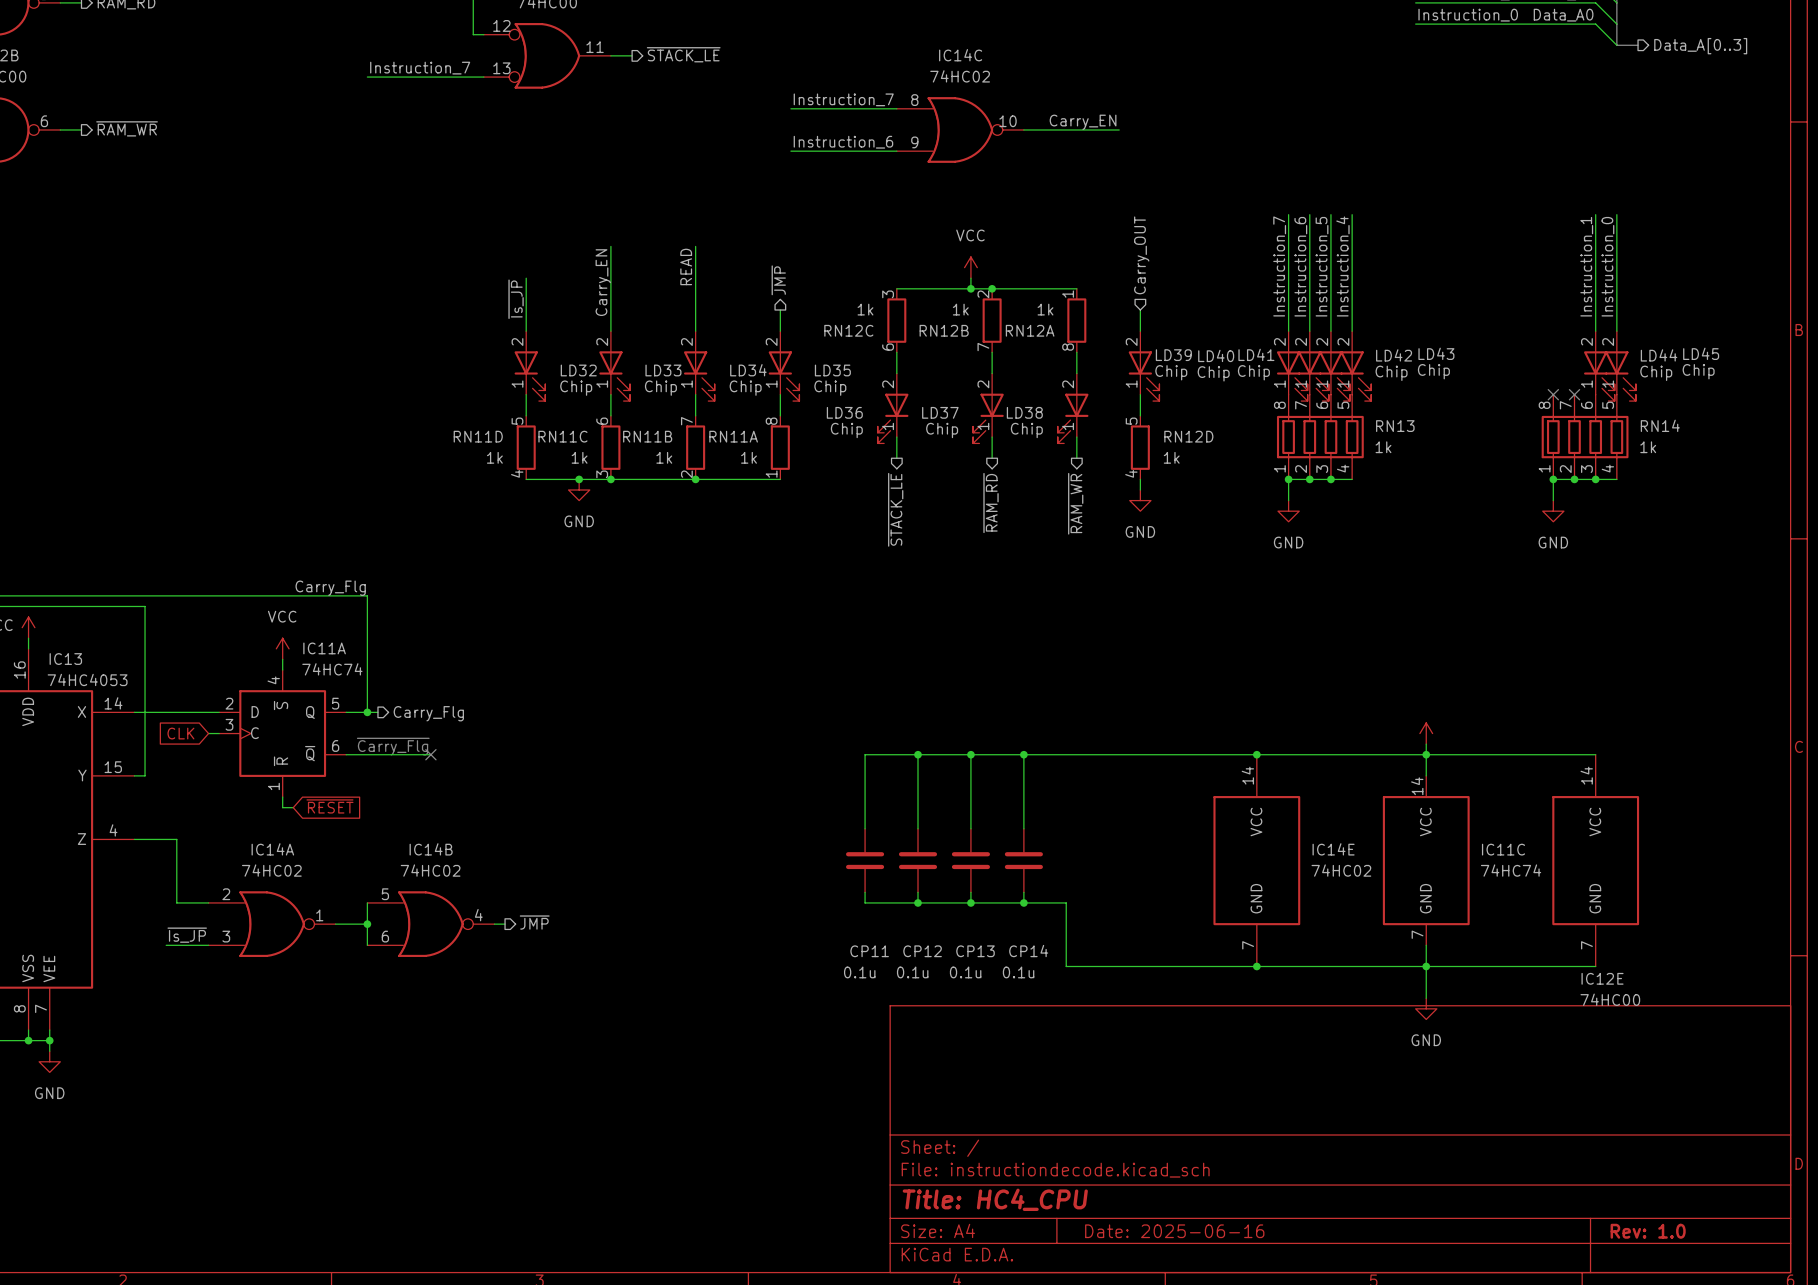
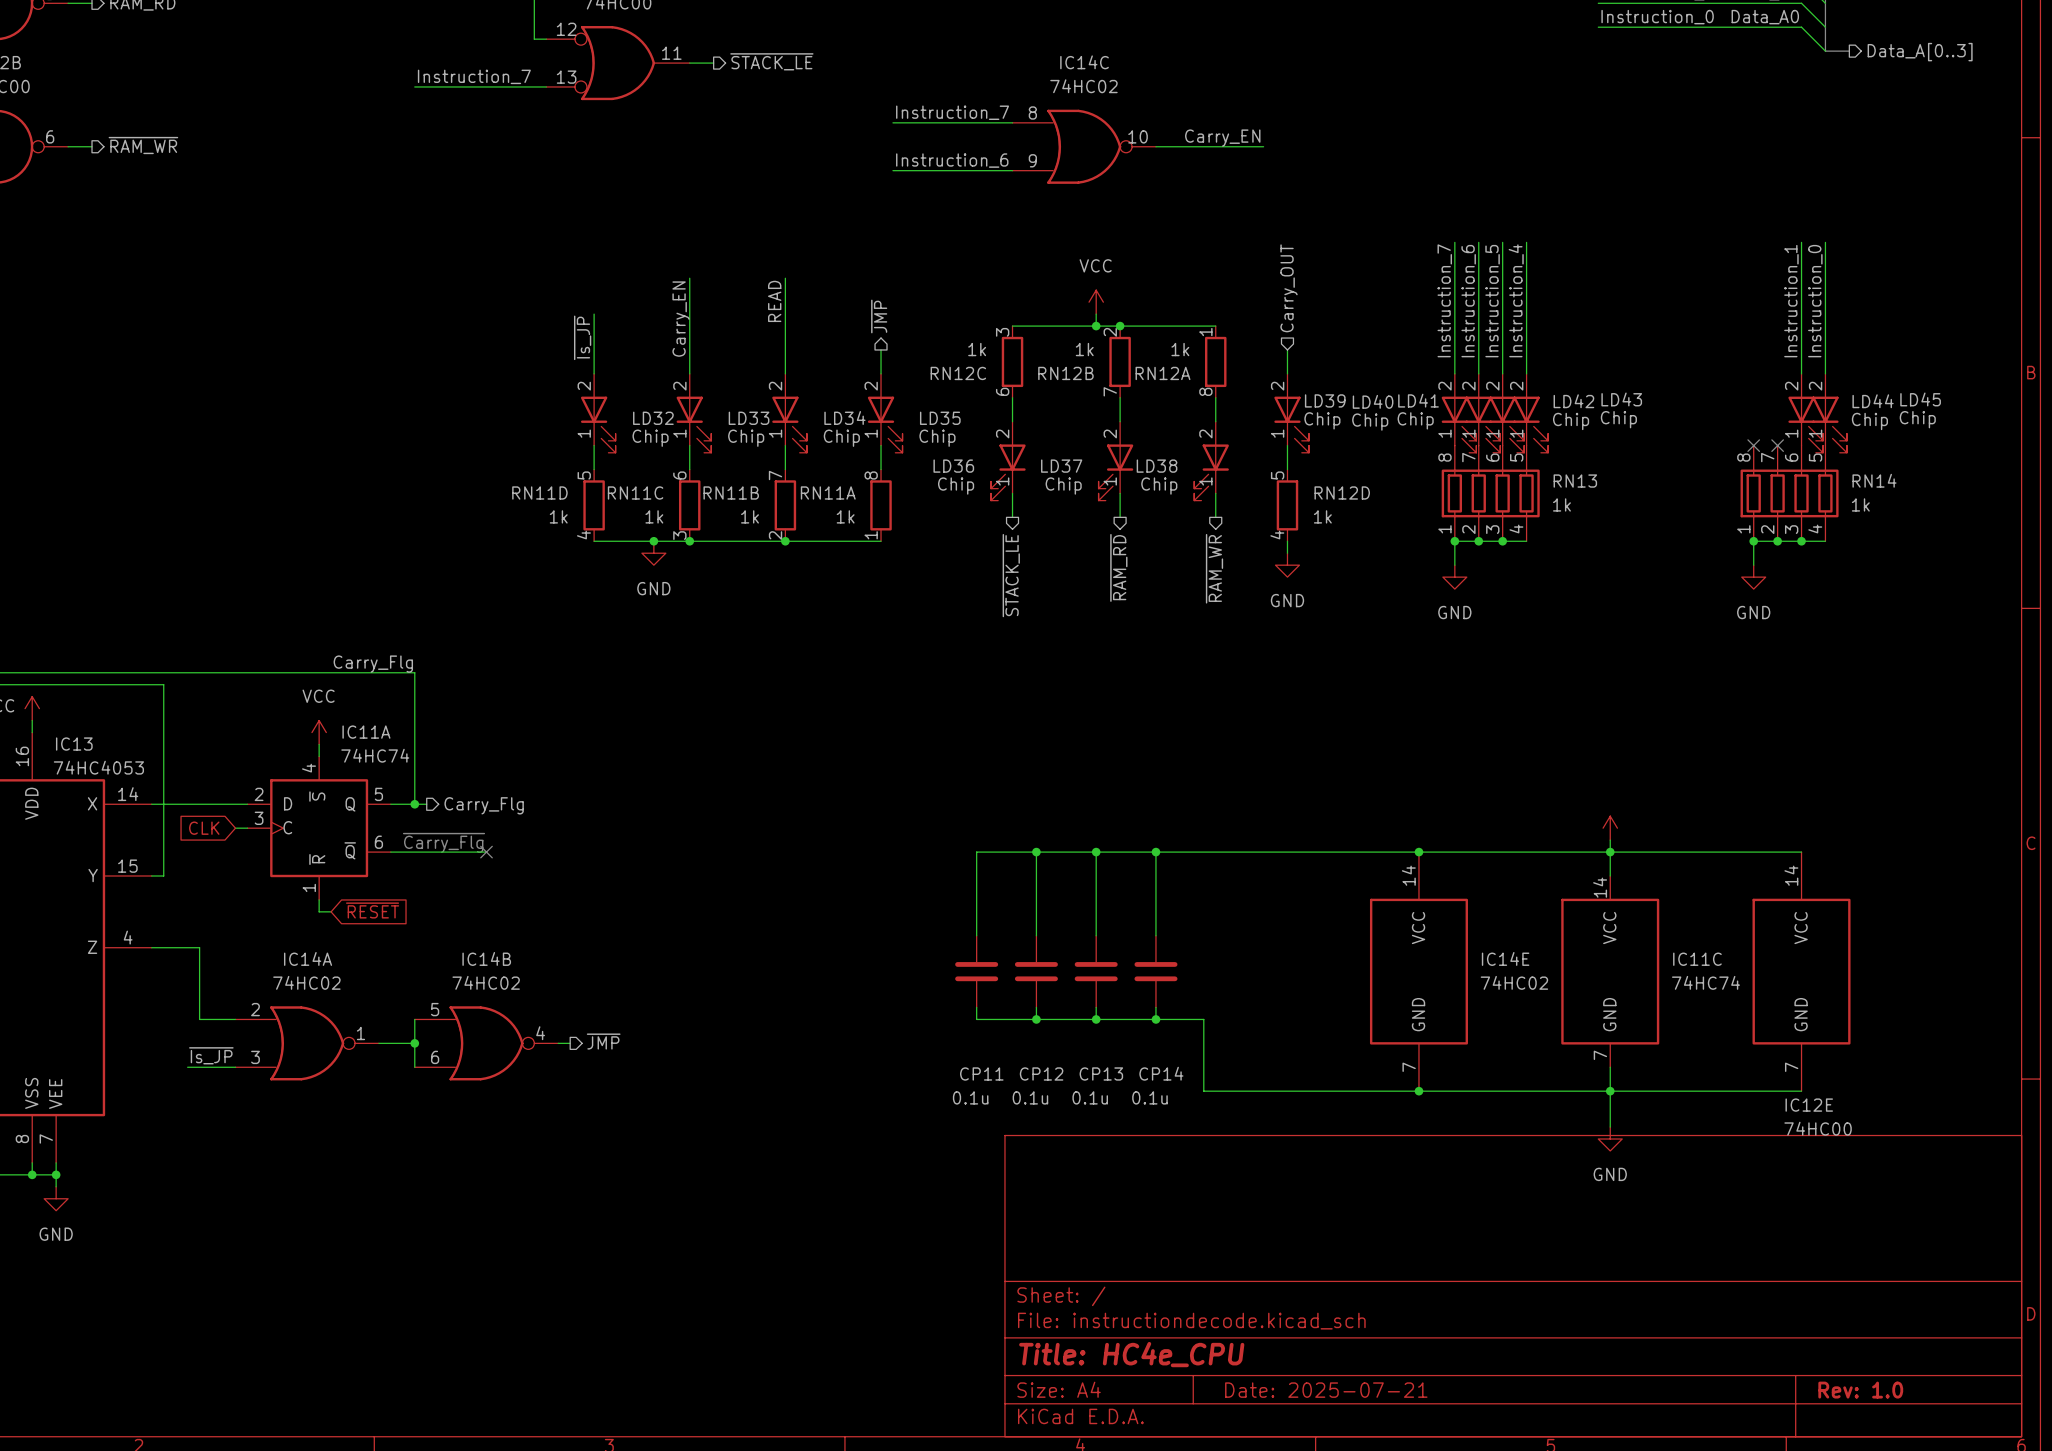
title block: Title: HC4_CPU (995, 1199) -> Title: HC4e_CPU (1131, 1354)
title block: Date: 2025-06-16 (1174, 1231) -> Date: 2025-07-21 (1326, 1390)

